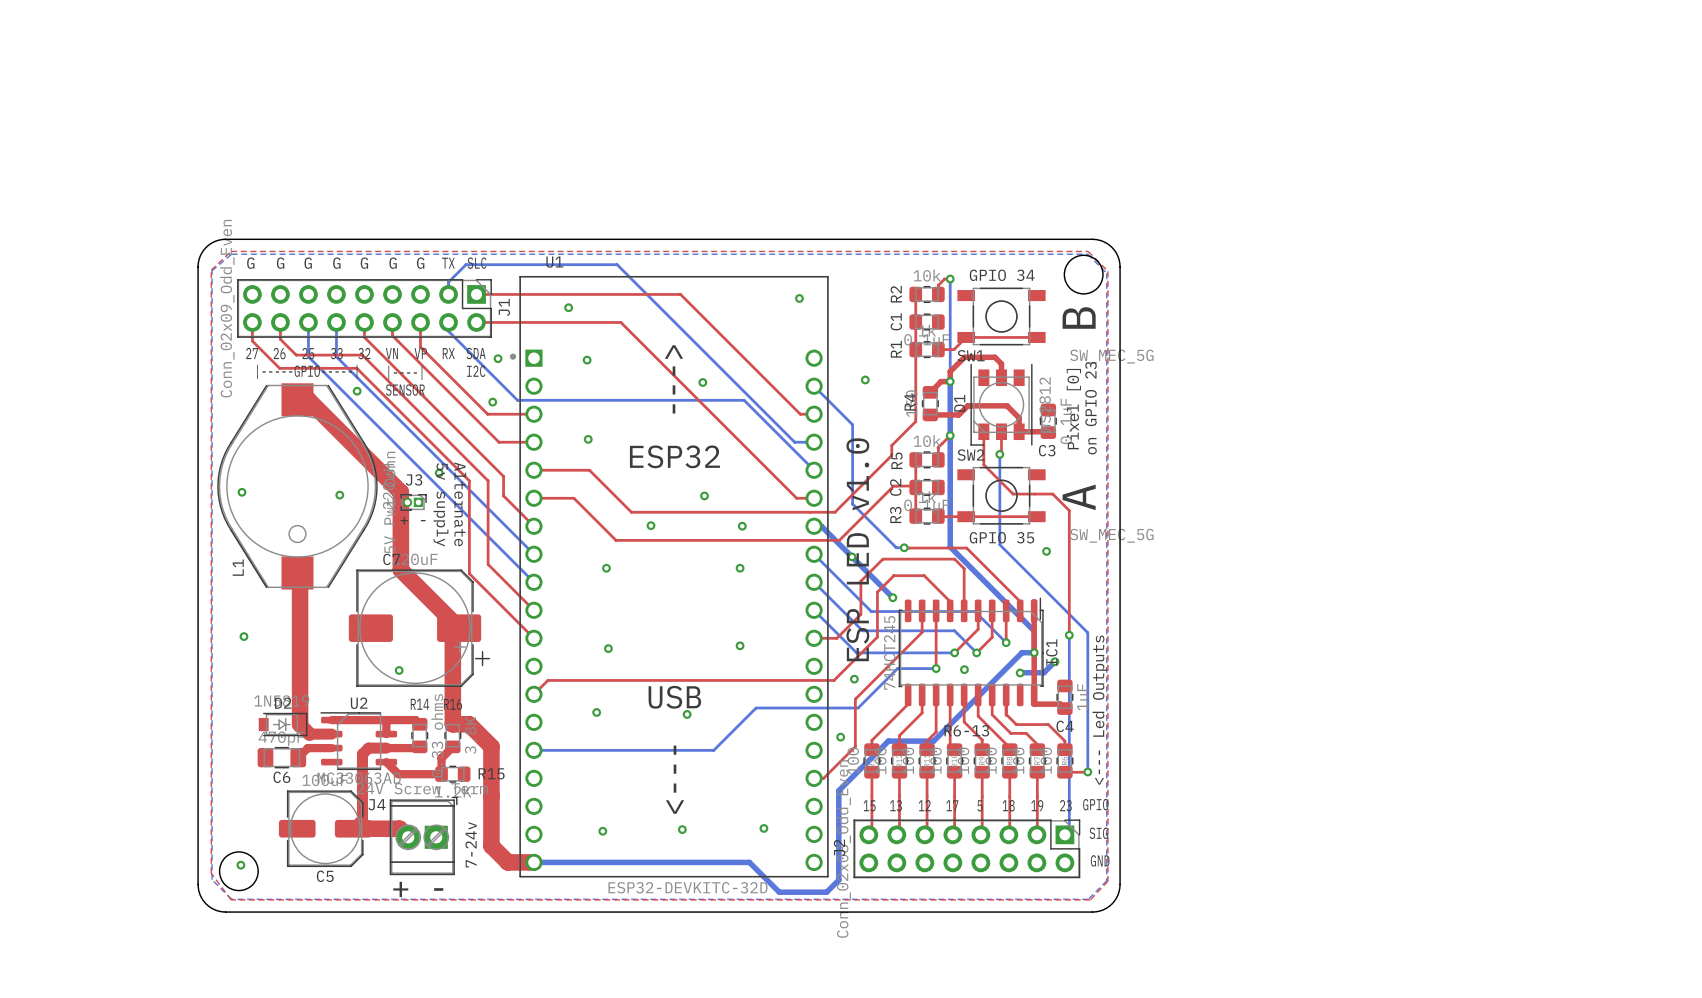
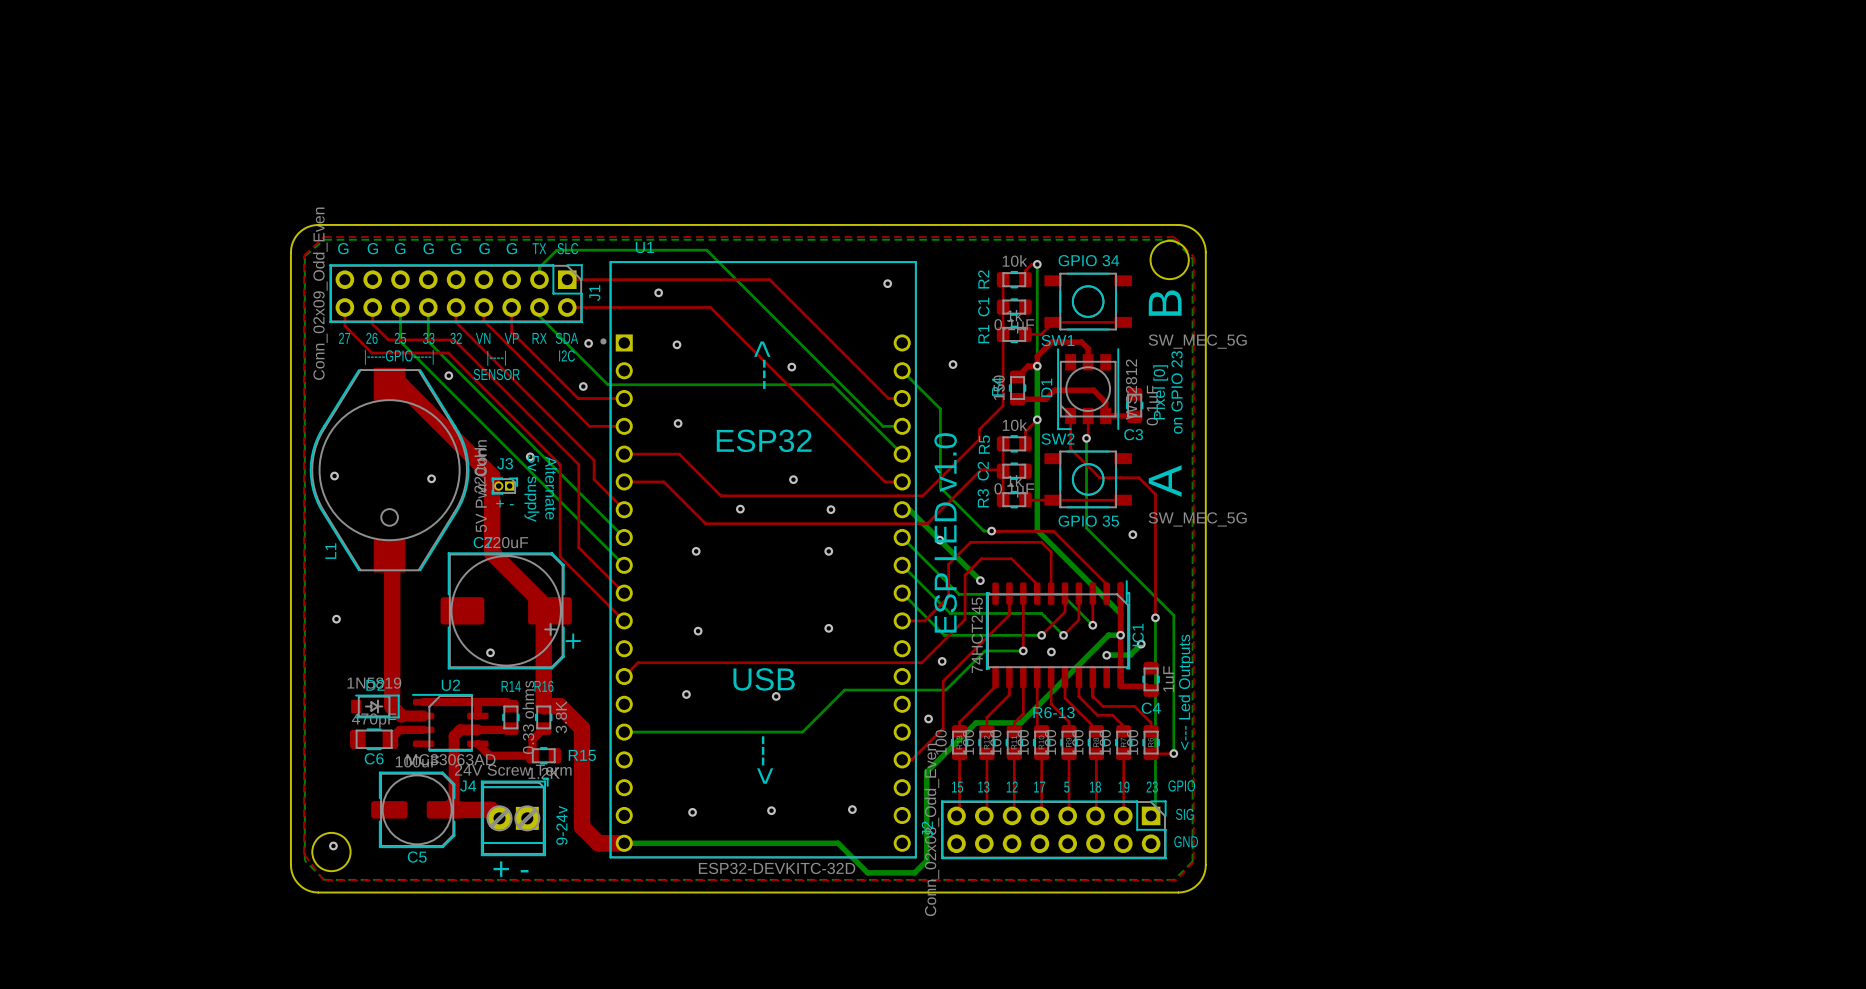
text: 7-24v (471, 844) -> 9-24v (561, 825)

